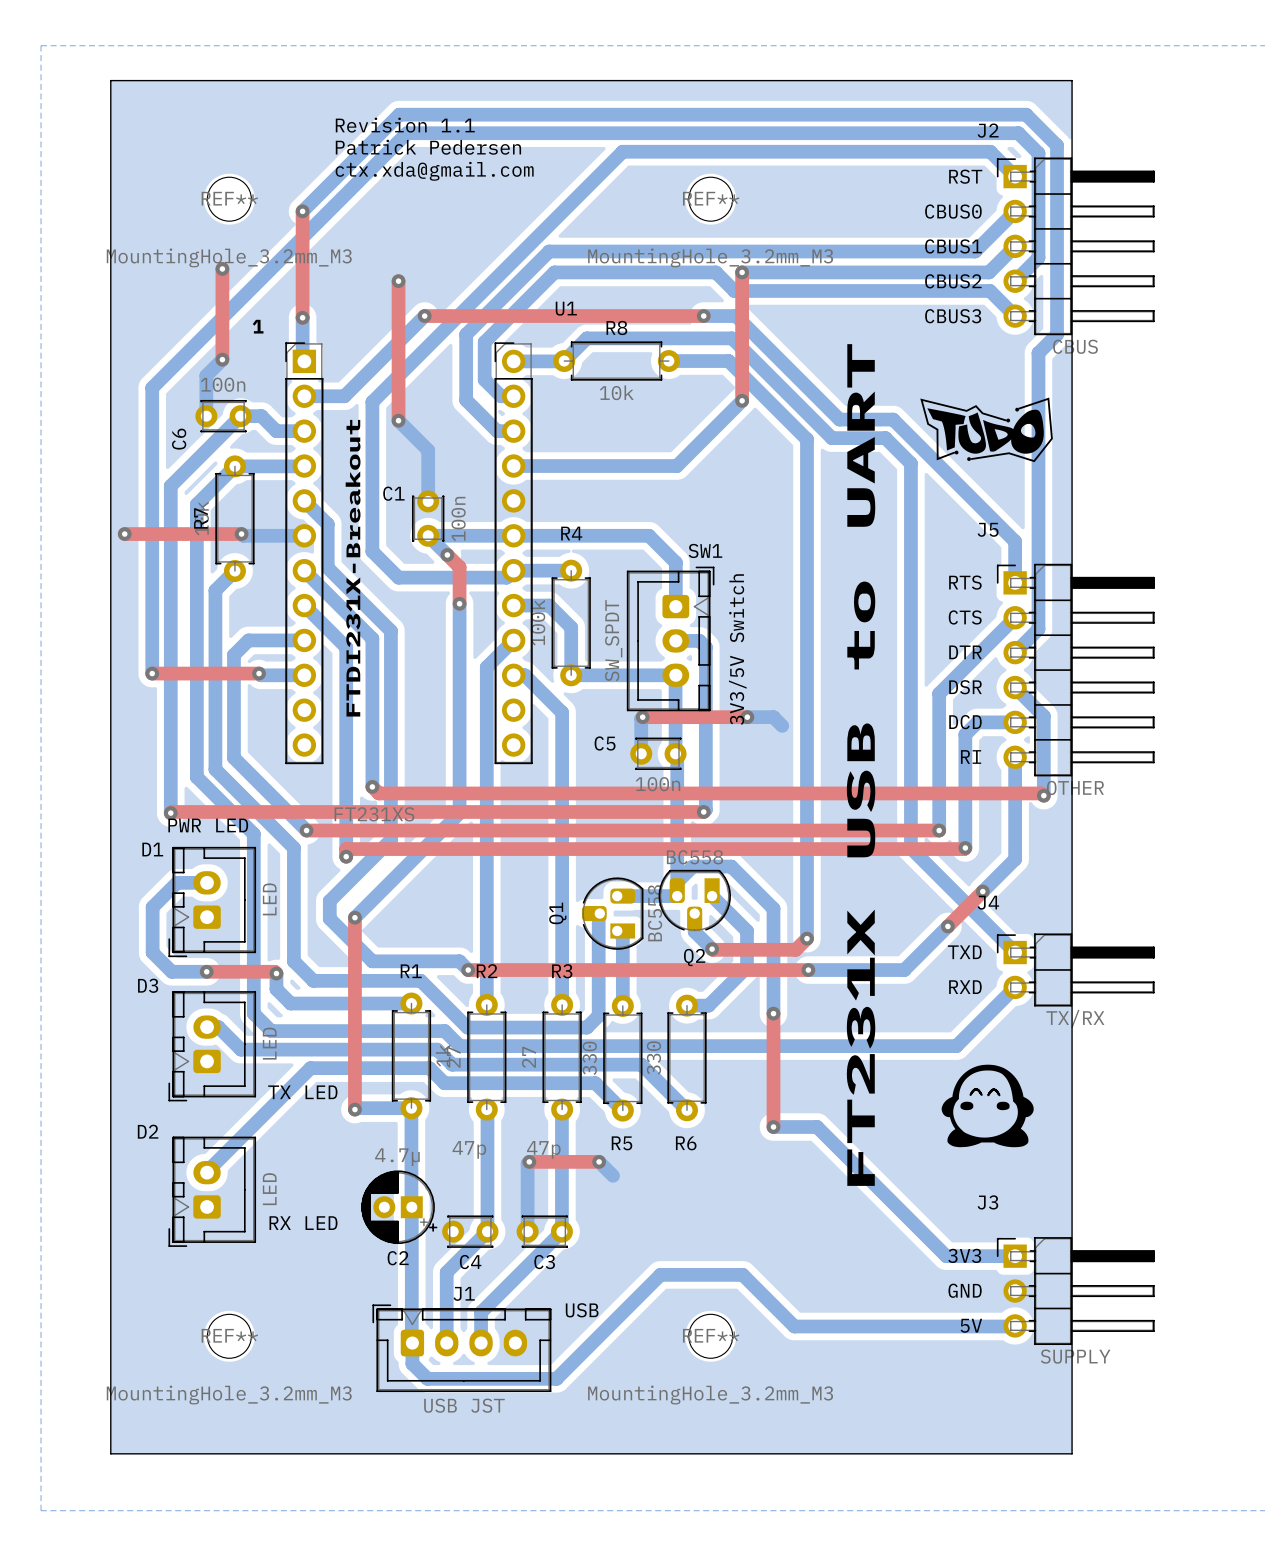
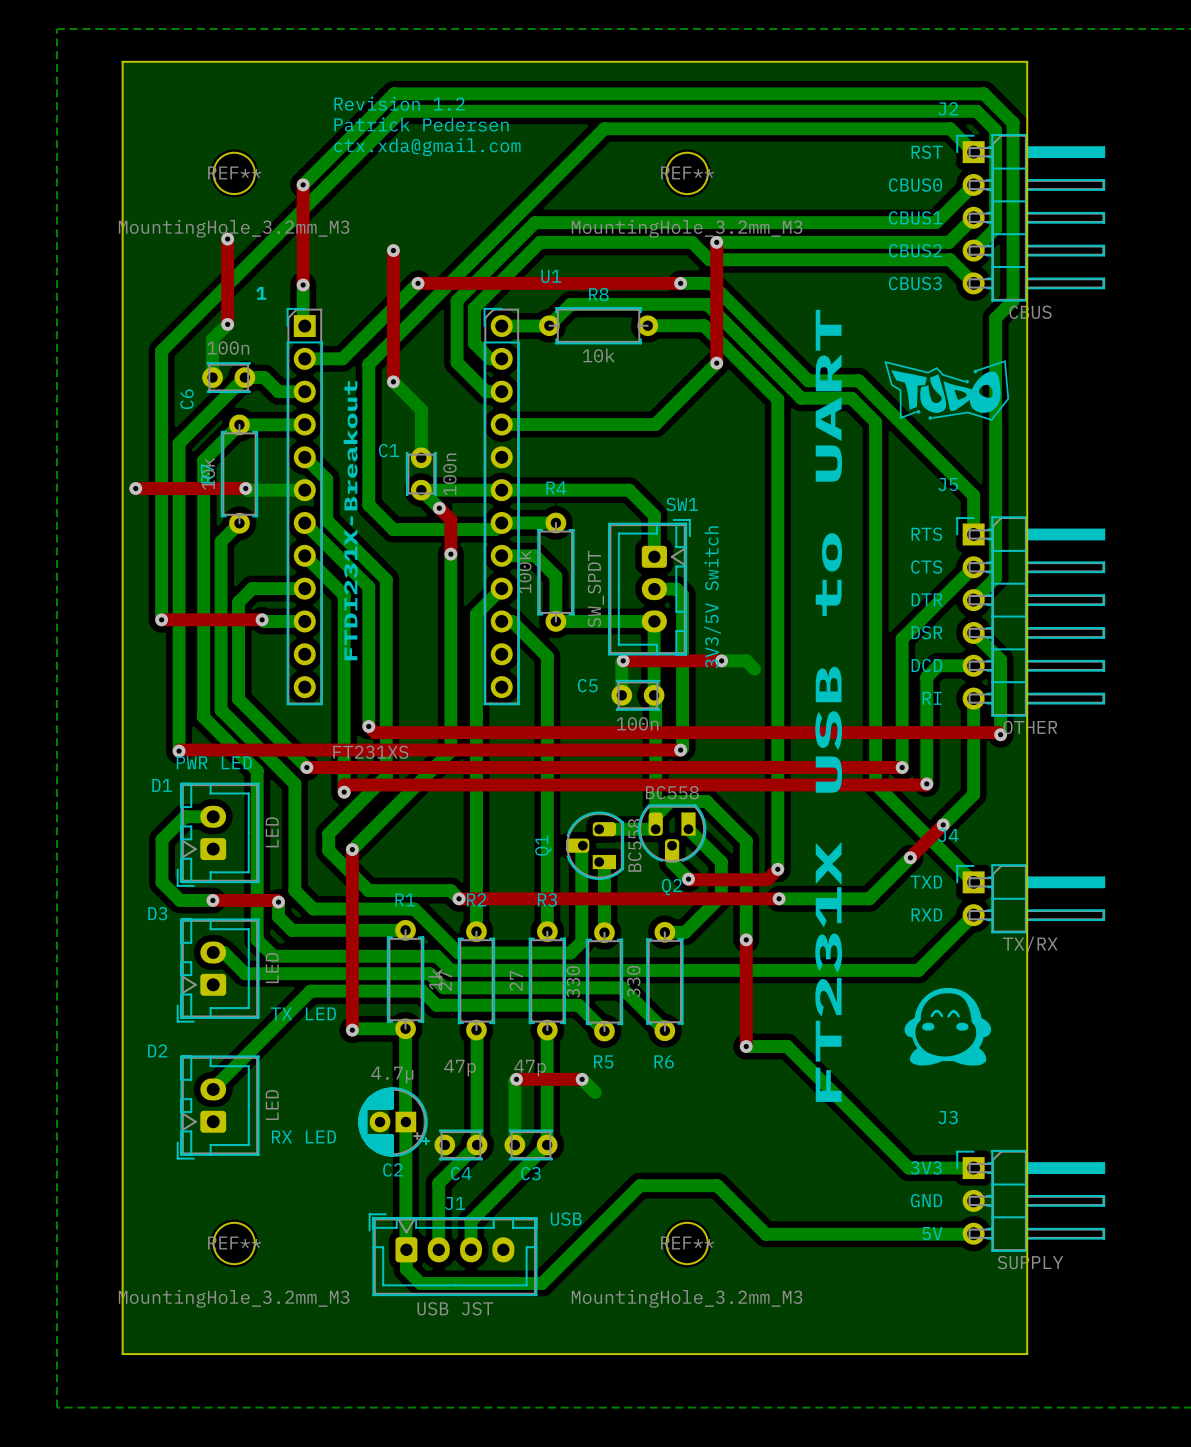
text: Revision 1.1 (405, 125) -> Revision 1.2 (399, 103)

